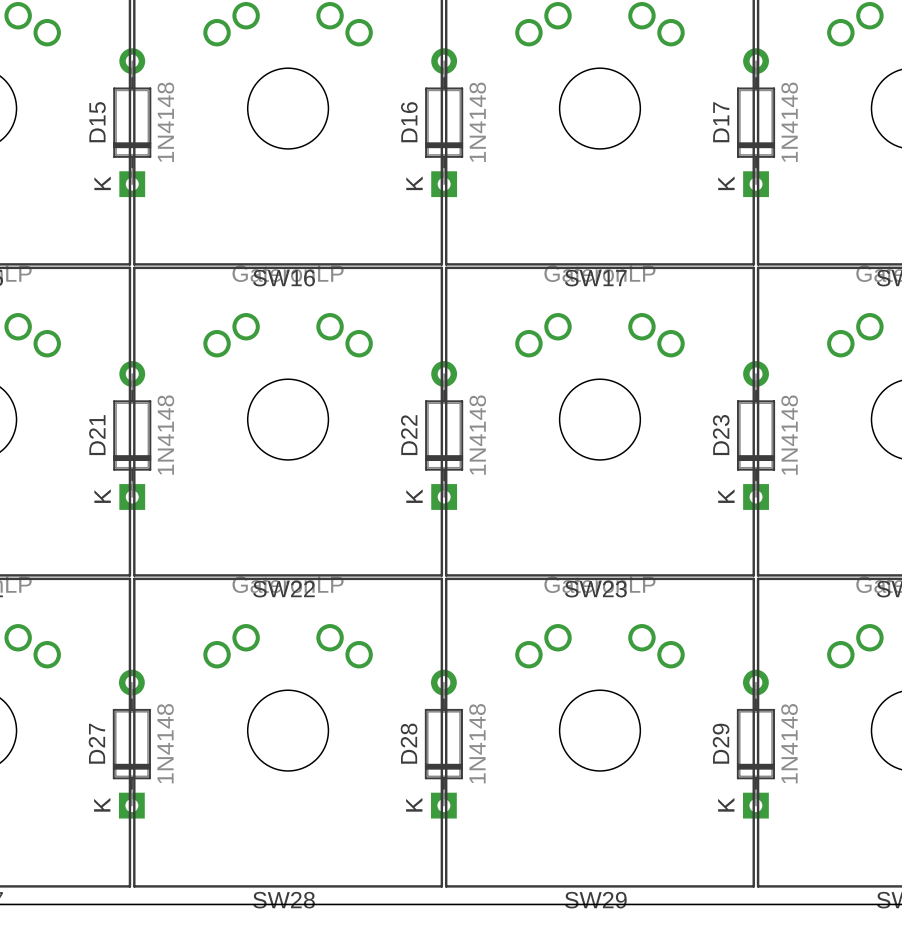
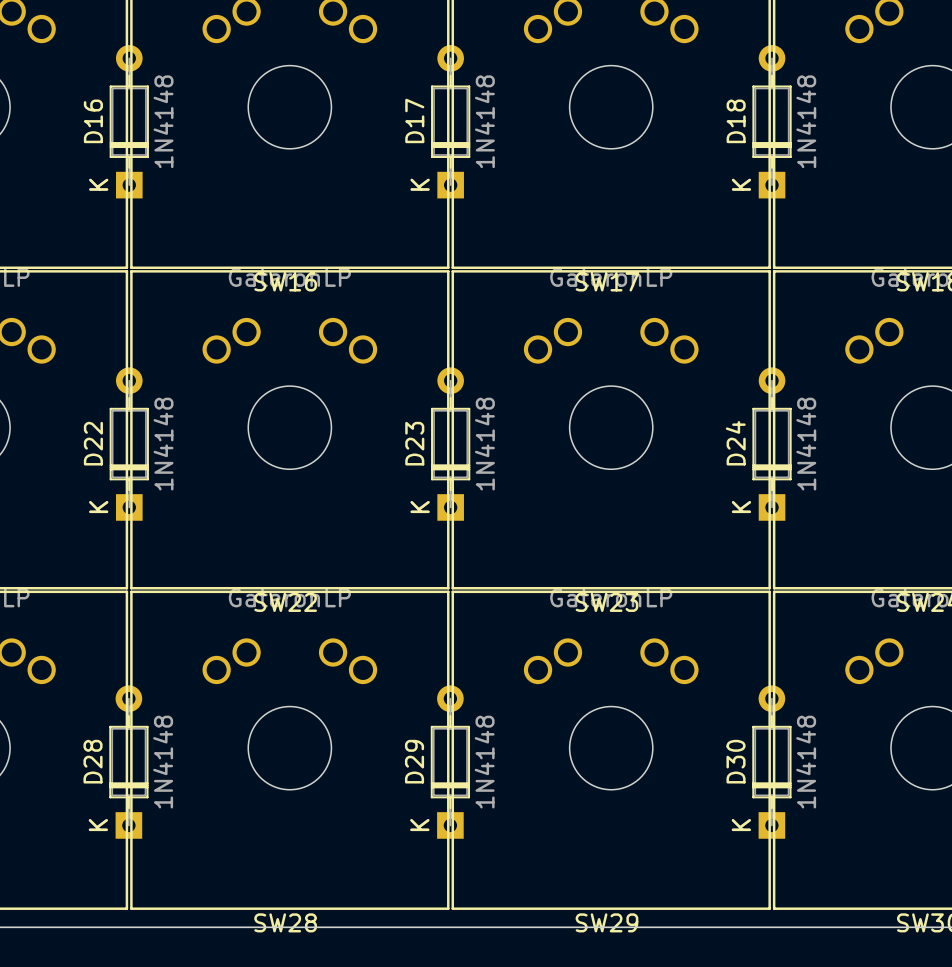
D15 name: D15 (97, 122) -> D16 (93, 121)
D16 name: D16 (409, 122) -> D17 (414, 120)
D17 name: D17 (721, 122) -> D18 (736, 121)
D21 name: D21 (97, 435) -> D22 (93, 443)
D22 name: D22 (409, 435) -> D23 (414, 443)
D23 name: D23 (721, 435) -> D24 (735, 443)
D27 name: D27 (96, 743) -> D28 (93, 761)
D28 name: D28 (409, 743) -> D29 (414, 761)
D29 name: D29 (721, 743) -> D30 (736, 761)

